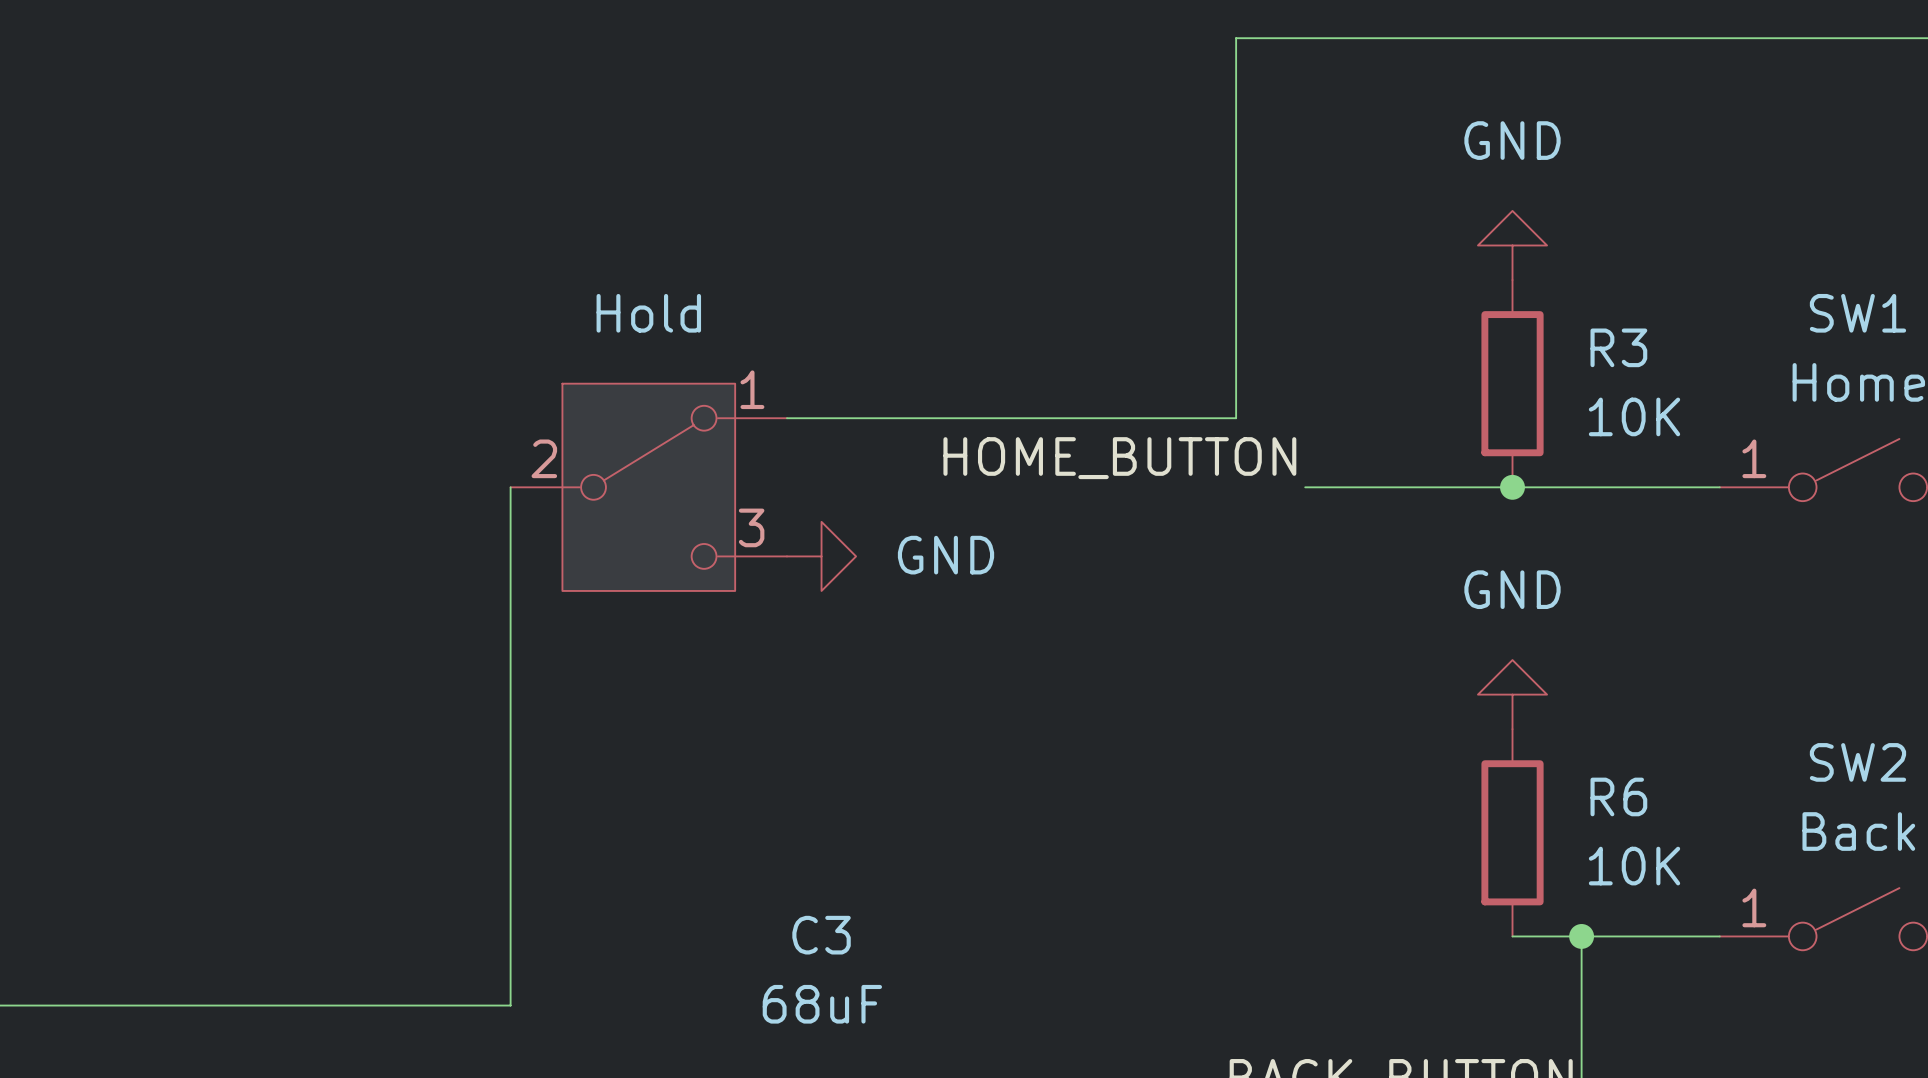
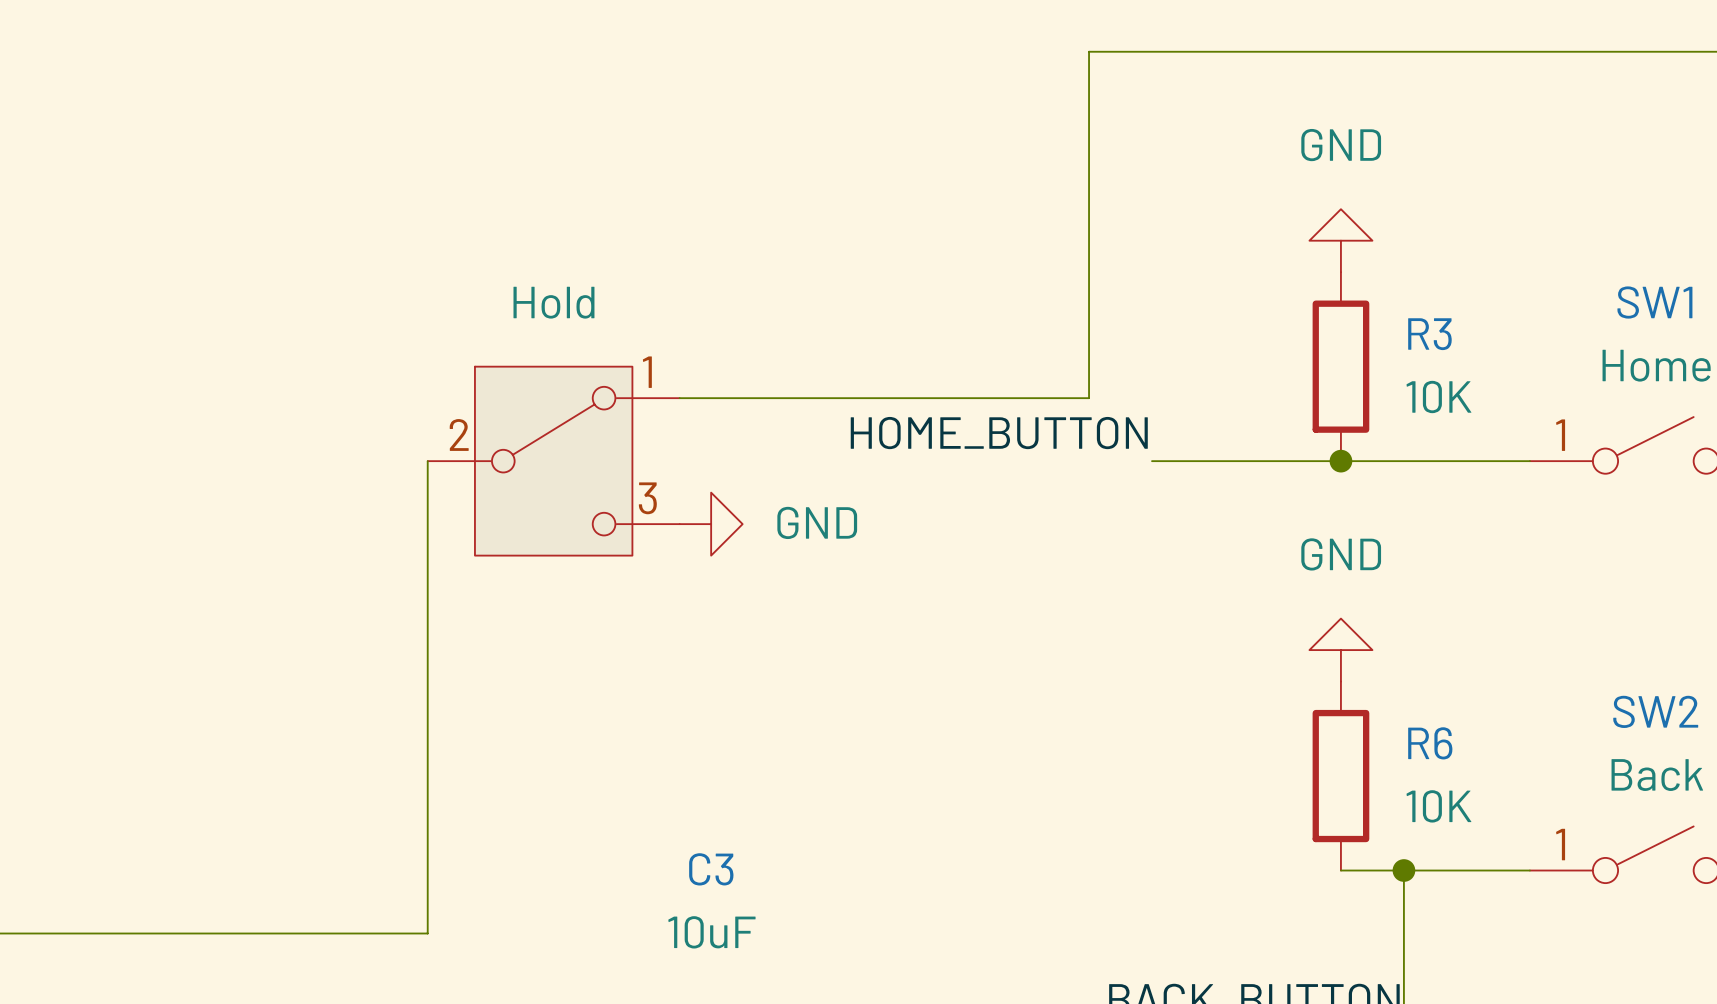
C3 value: 68uF (822, 1004) -> 10uF (711, 932)

